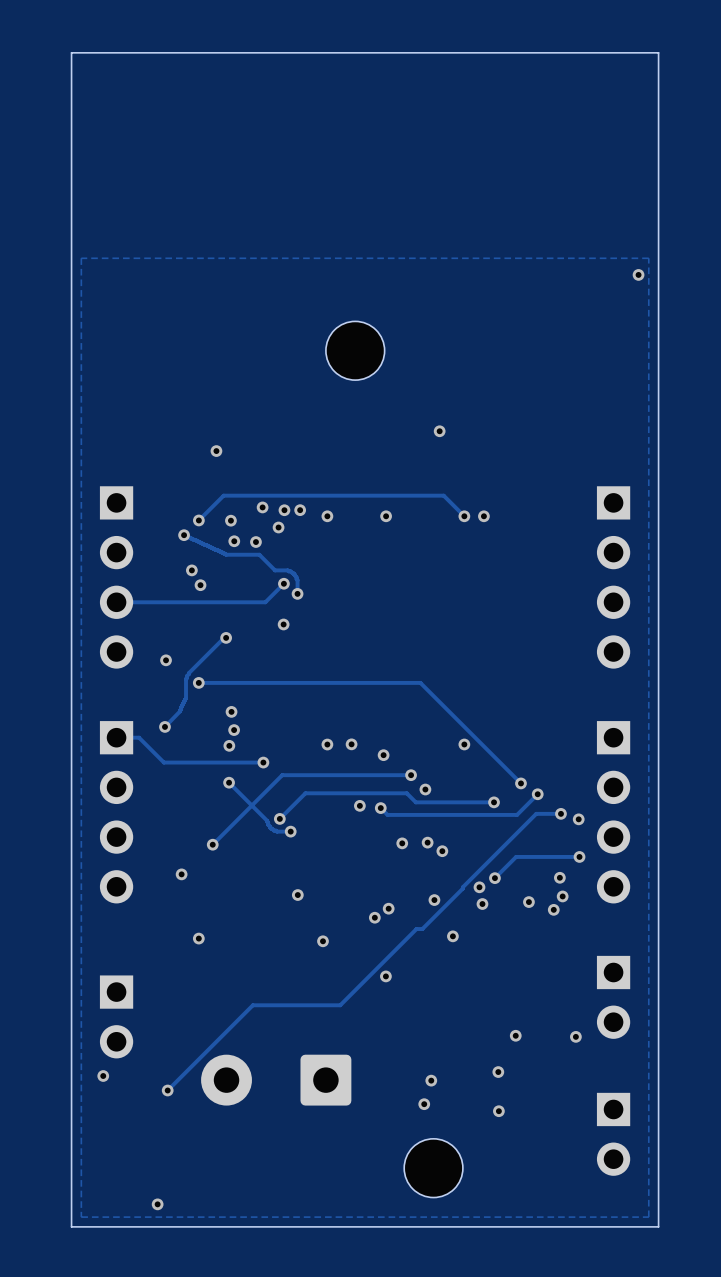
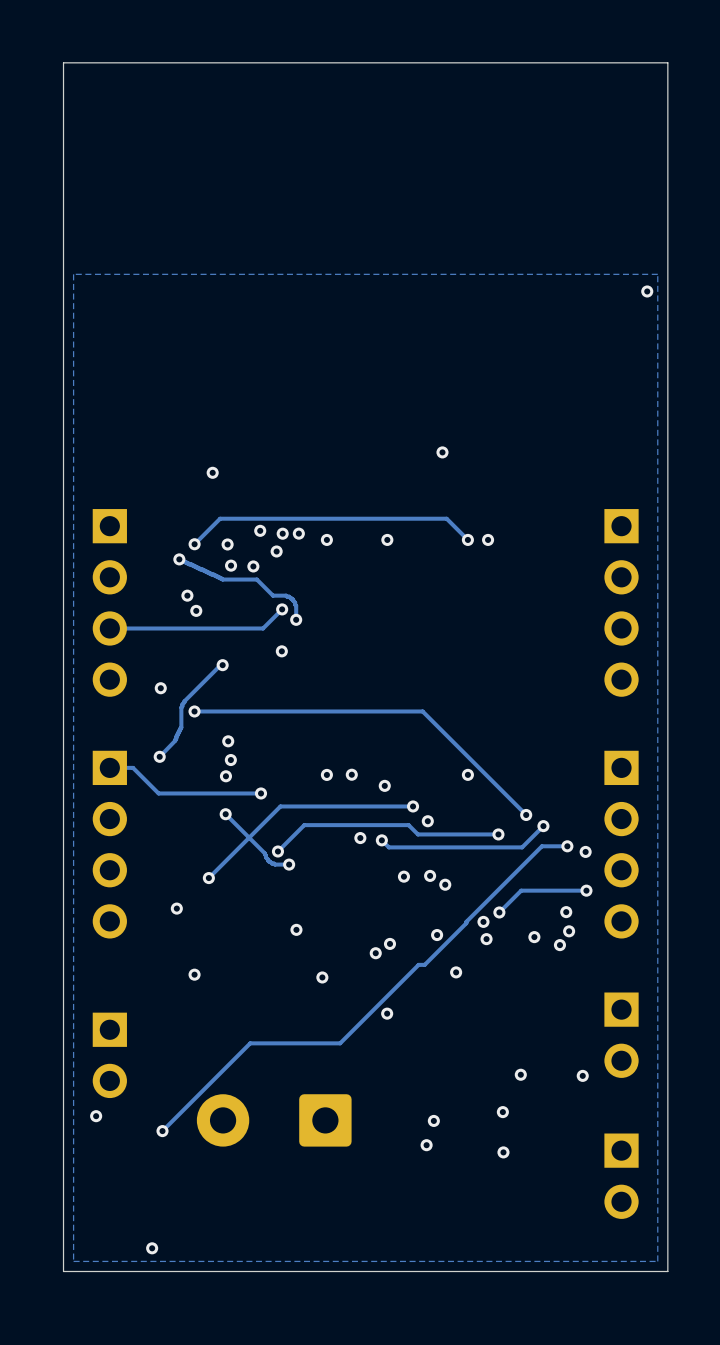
part: (355, 350) -> none
part: (433, 1168) -> none

